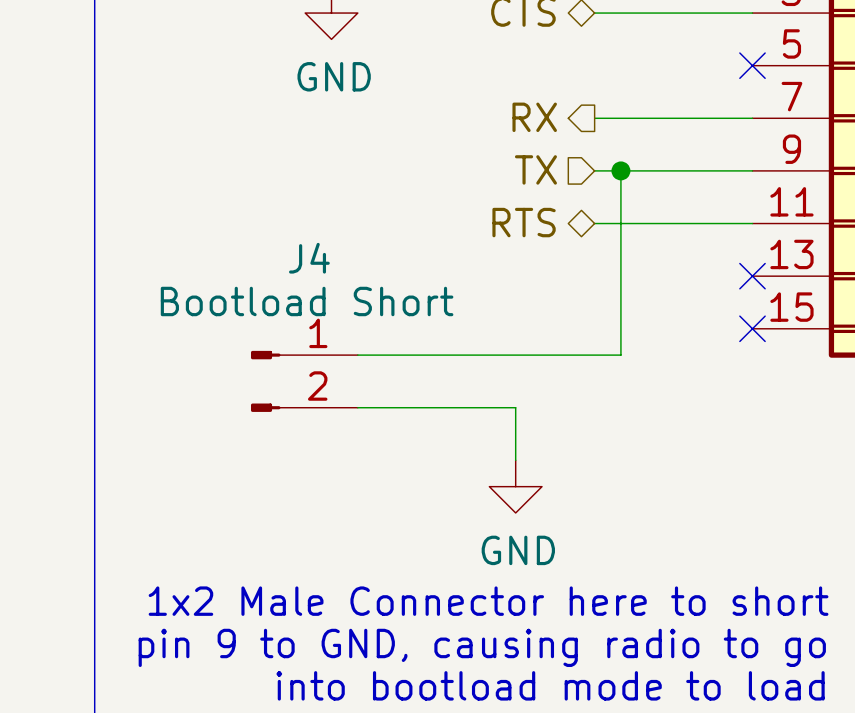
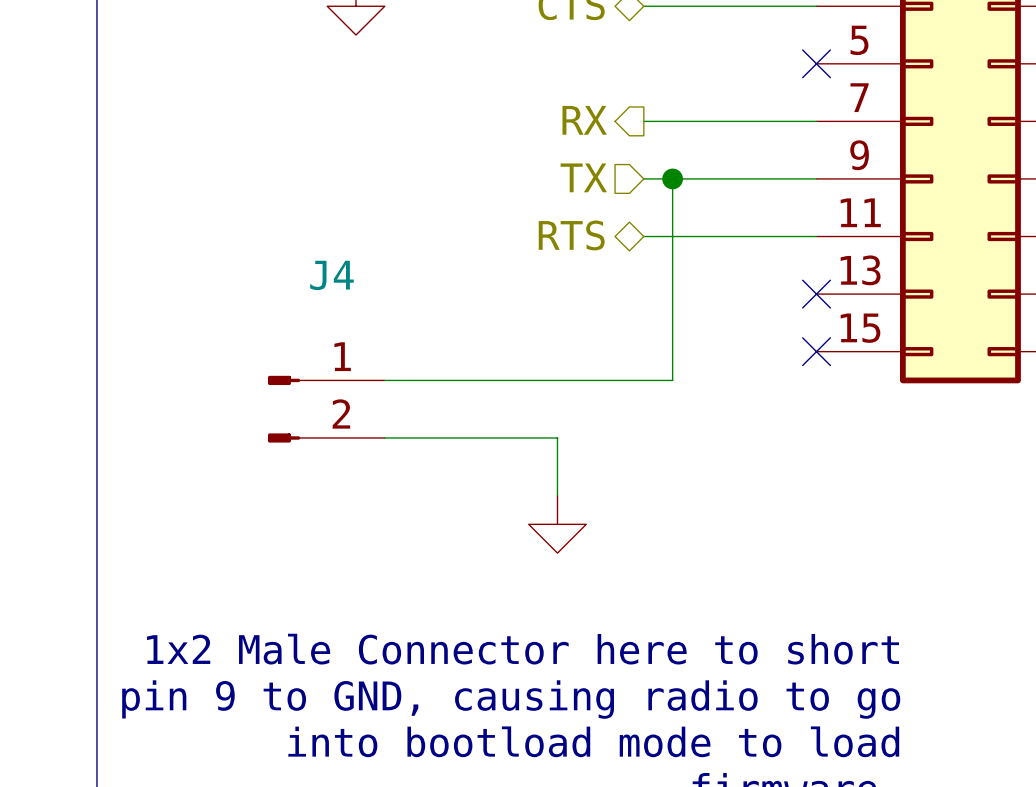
power symbol text: GND (334, 76) -> none
J4 value: Bootload Short (307, 301) -> none
power symbol text: GND (518, 550) -> none

